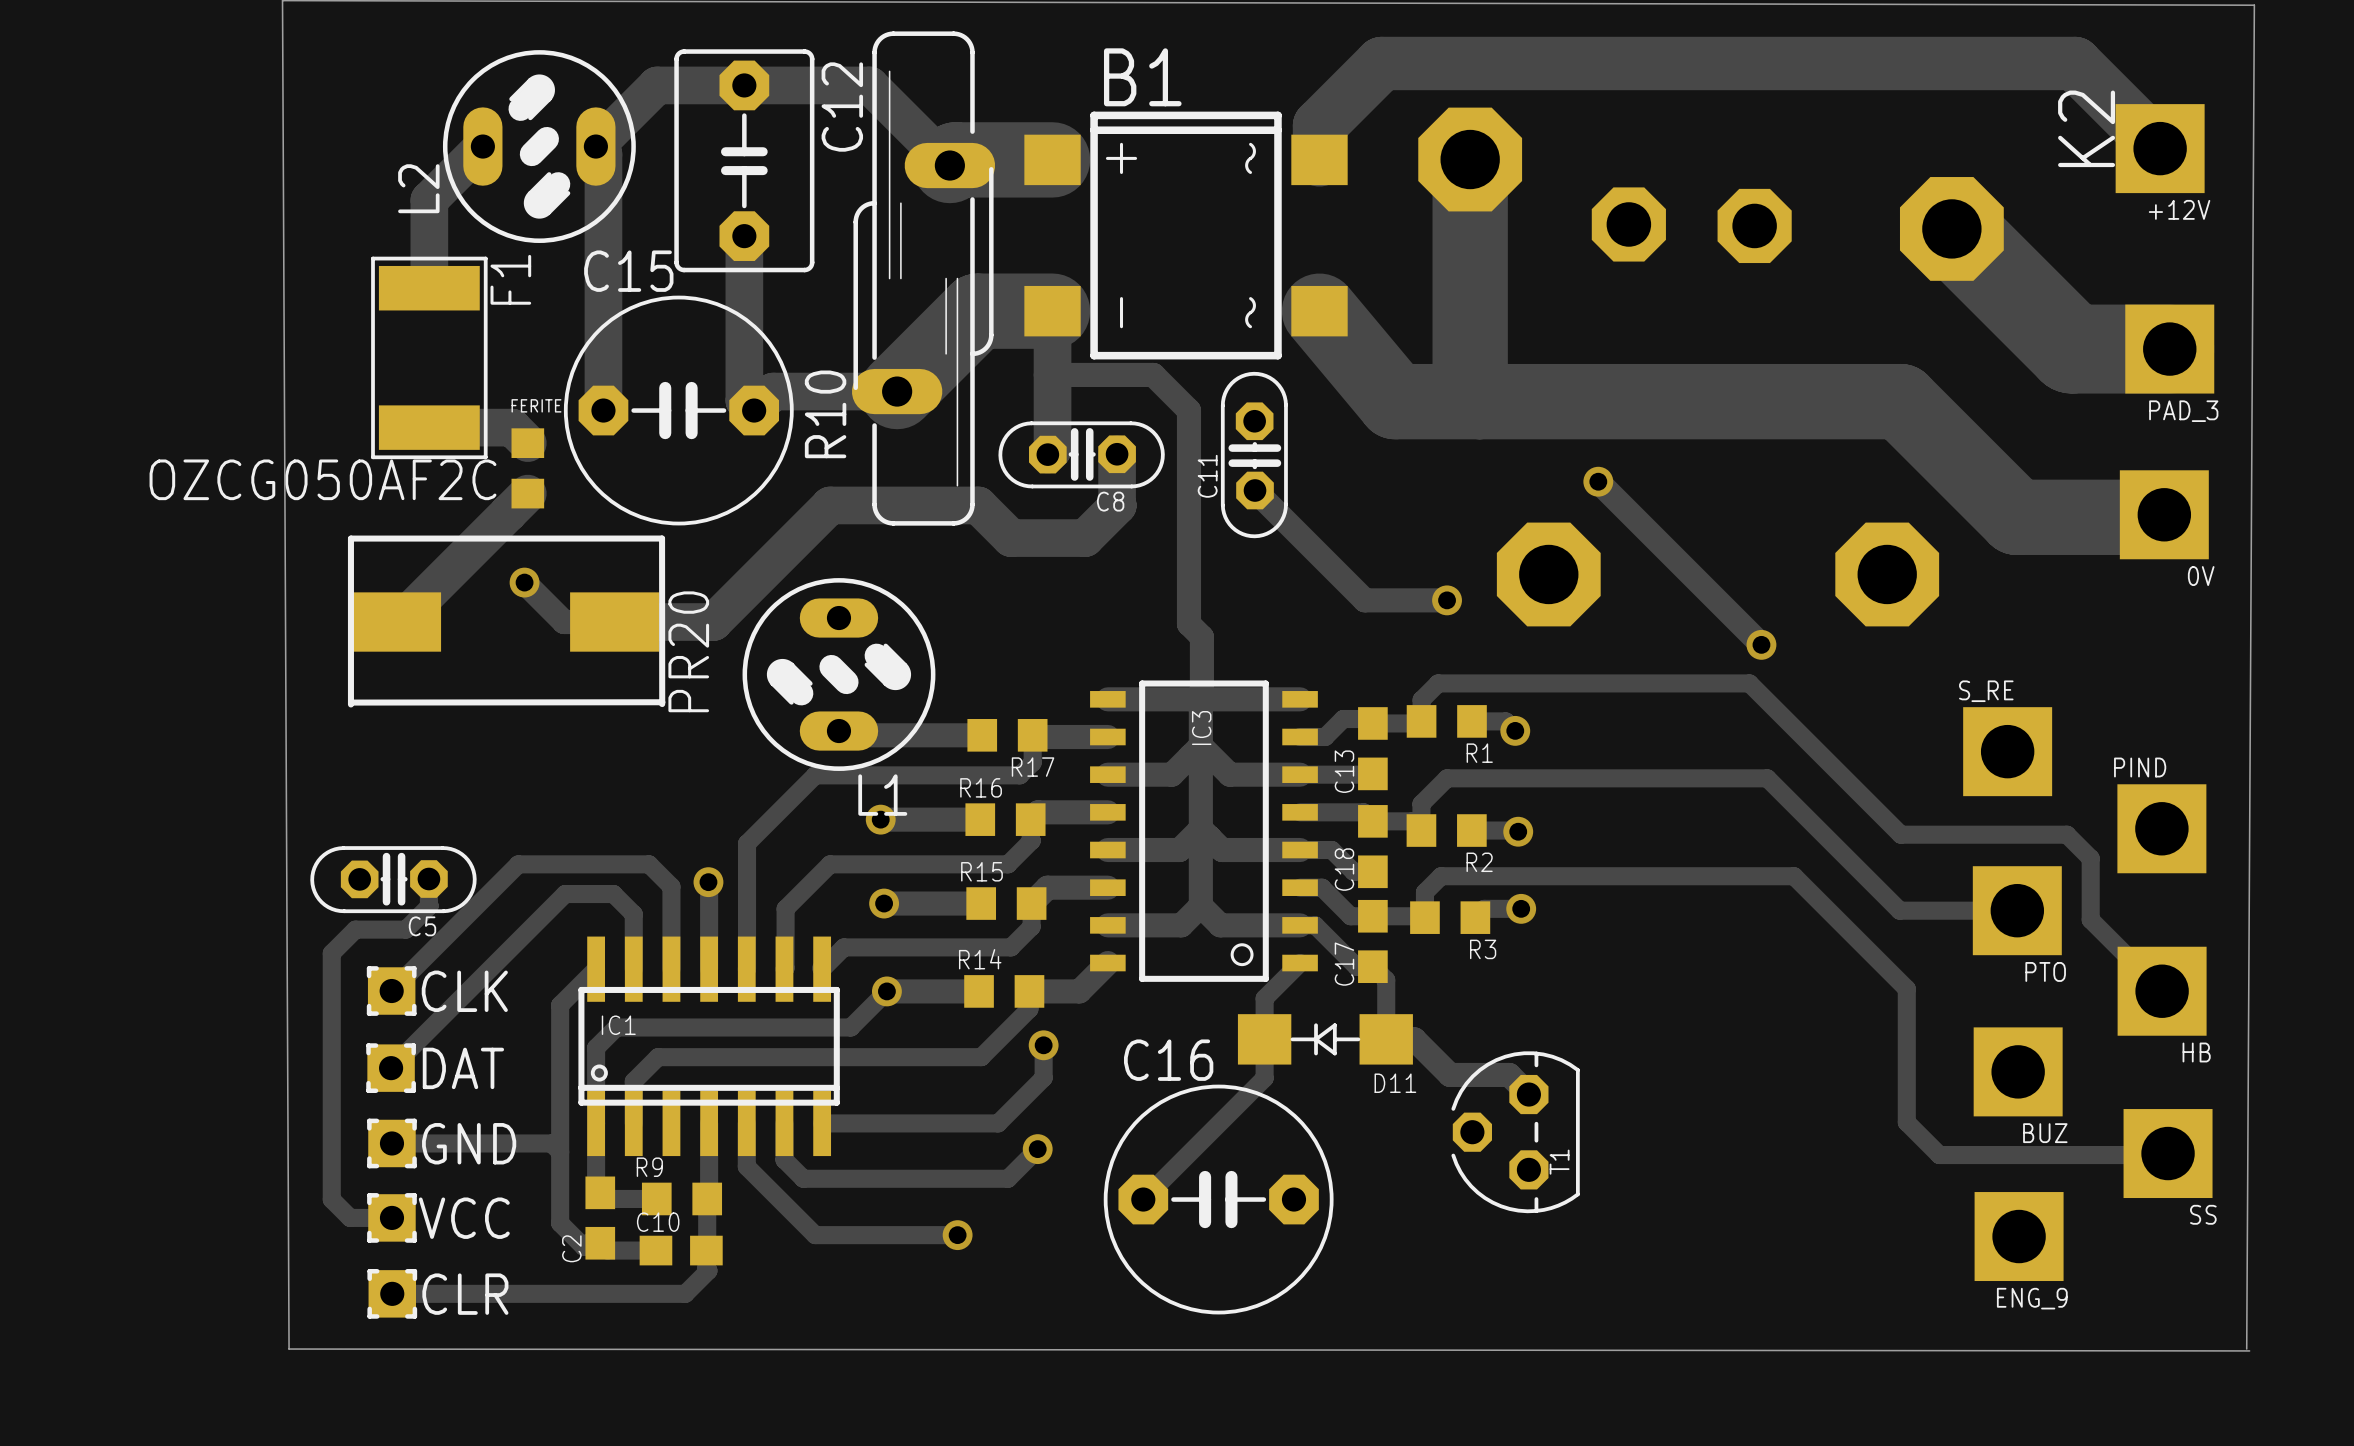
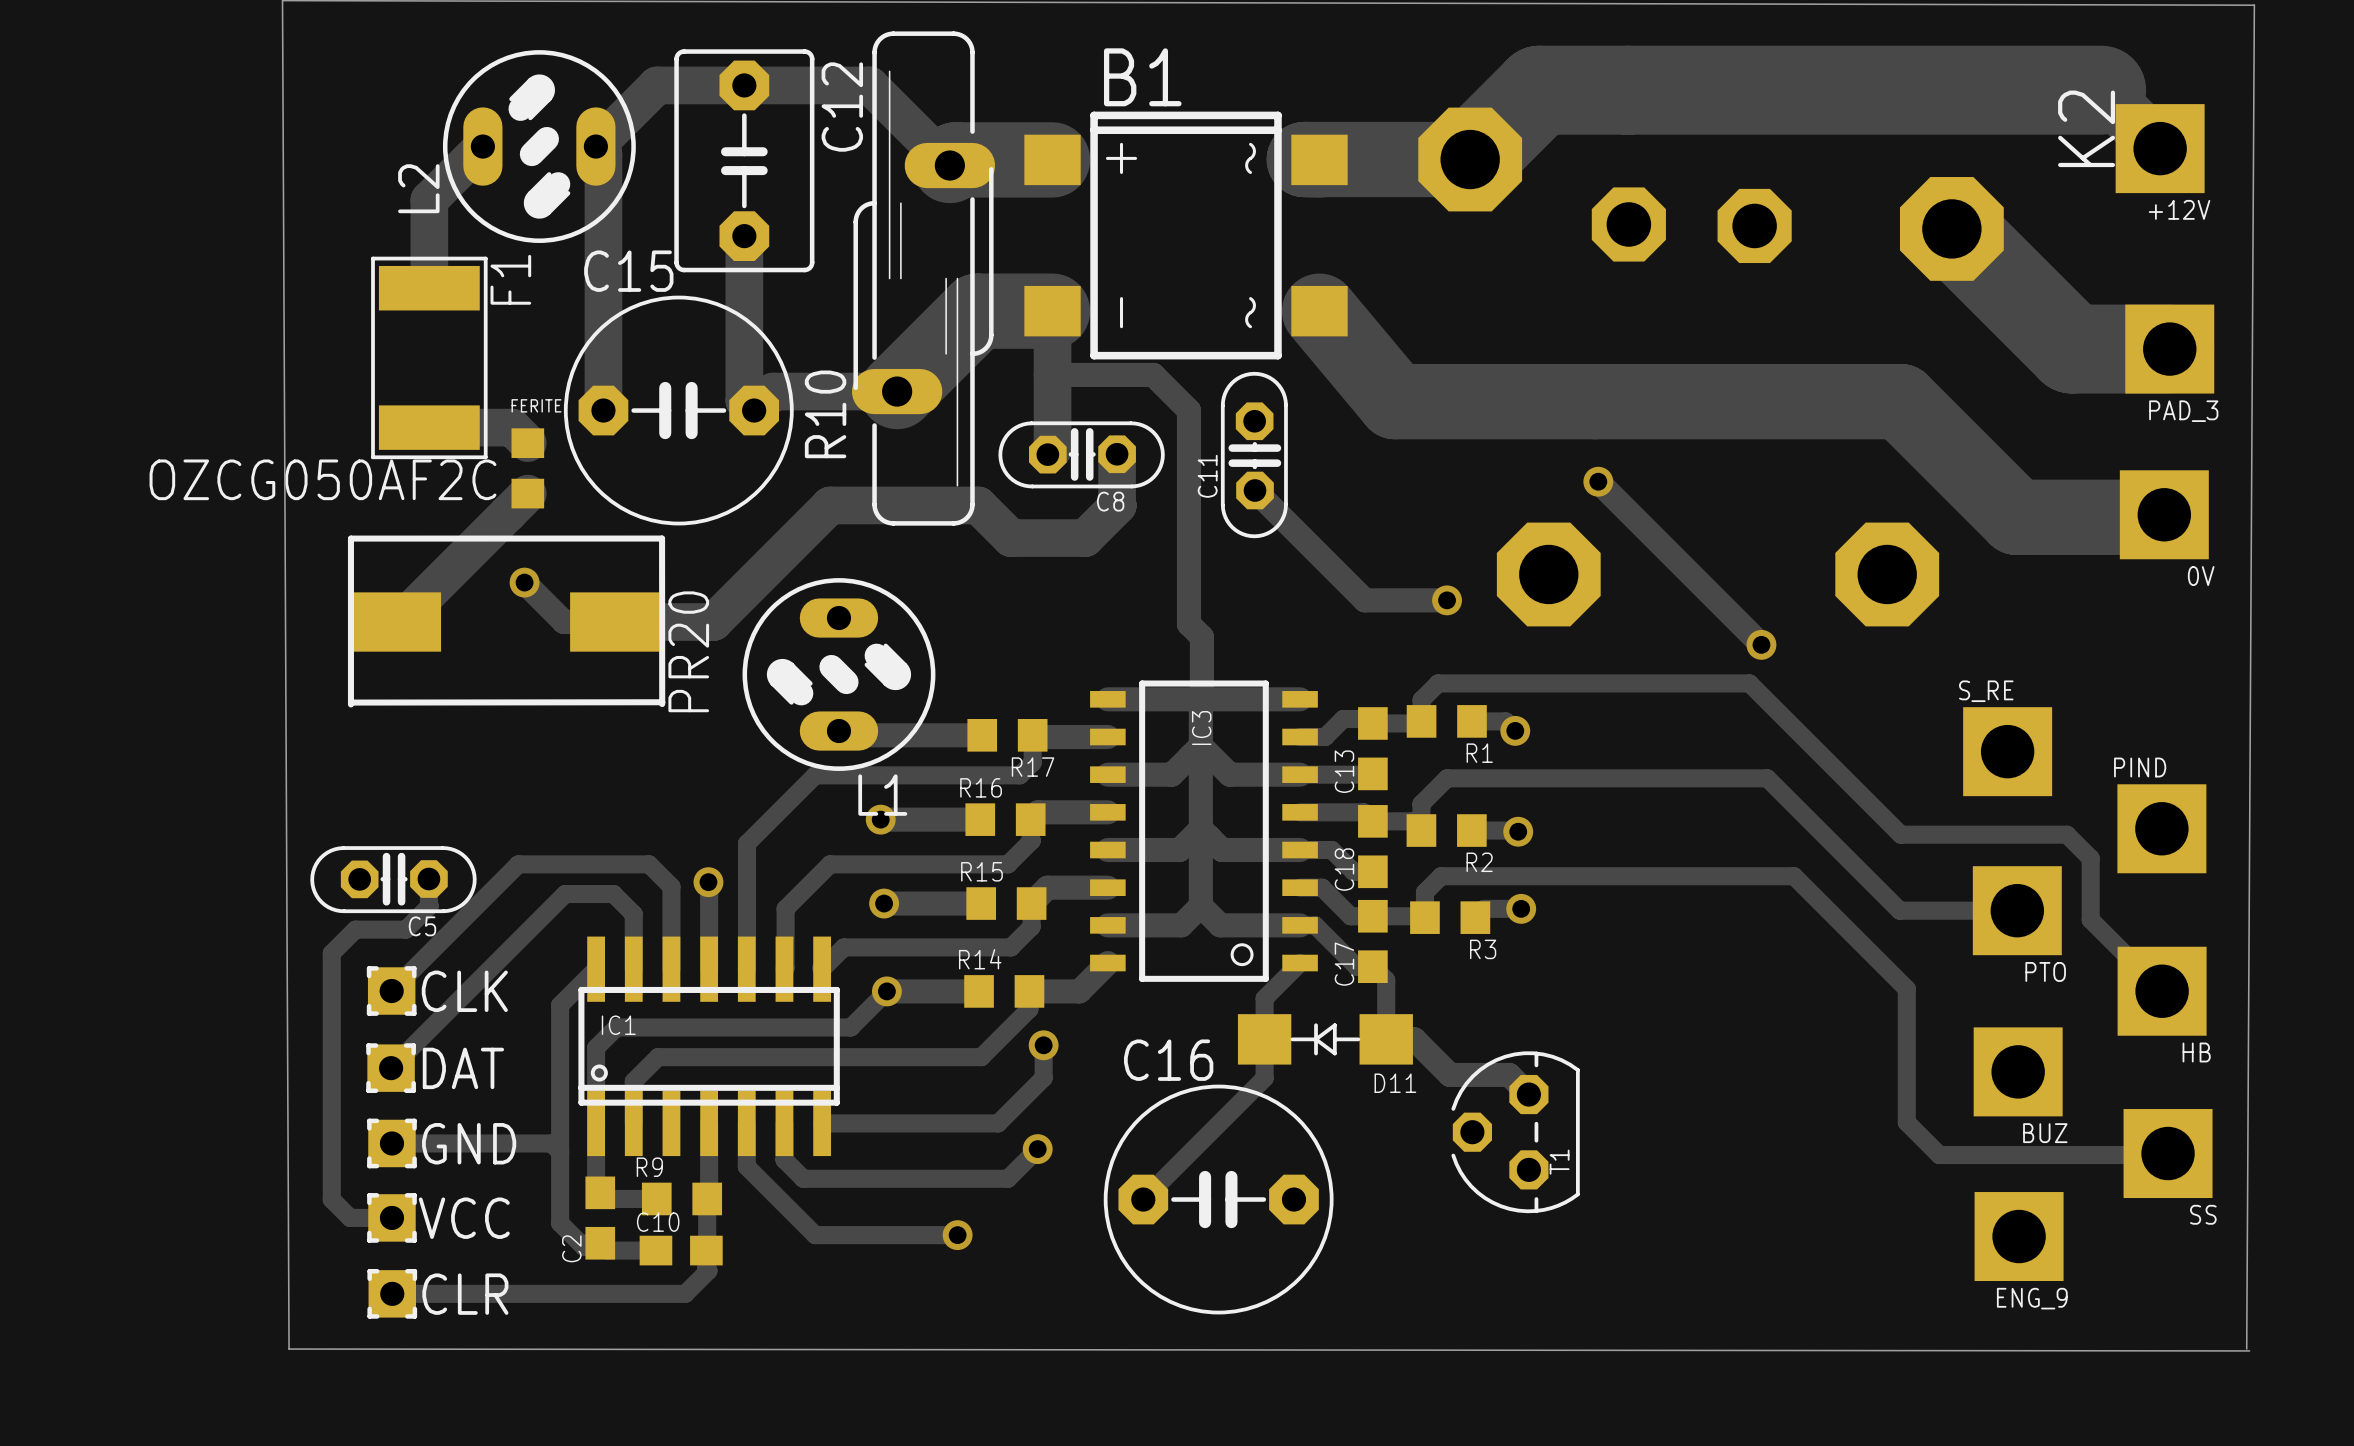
track: (2101, 90) (2075, 63) (1381, 63) (1319, 125) (1319, 159) -> (2101, 90) (1539, 90) (1470, 159) (1304, 159) (1319, 159)
track: (1470, 159) (1470, 392) (1479, 401) -> none

